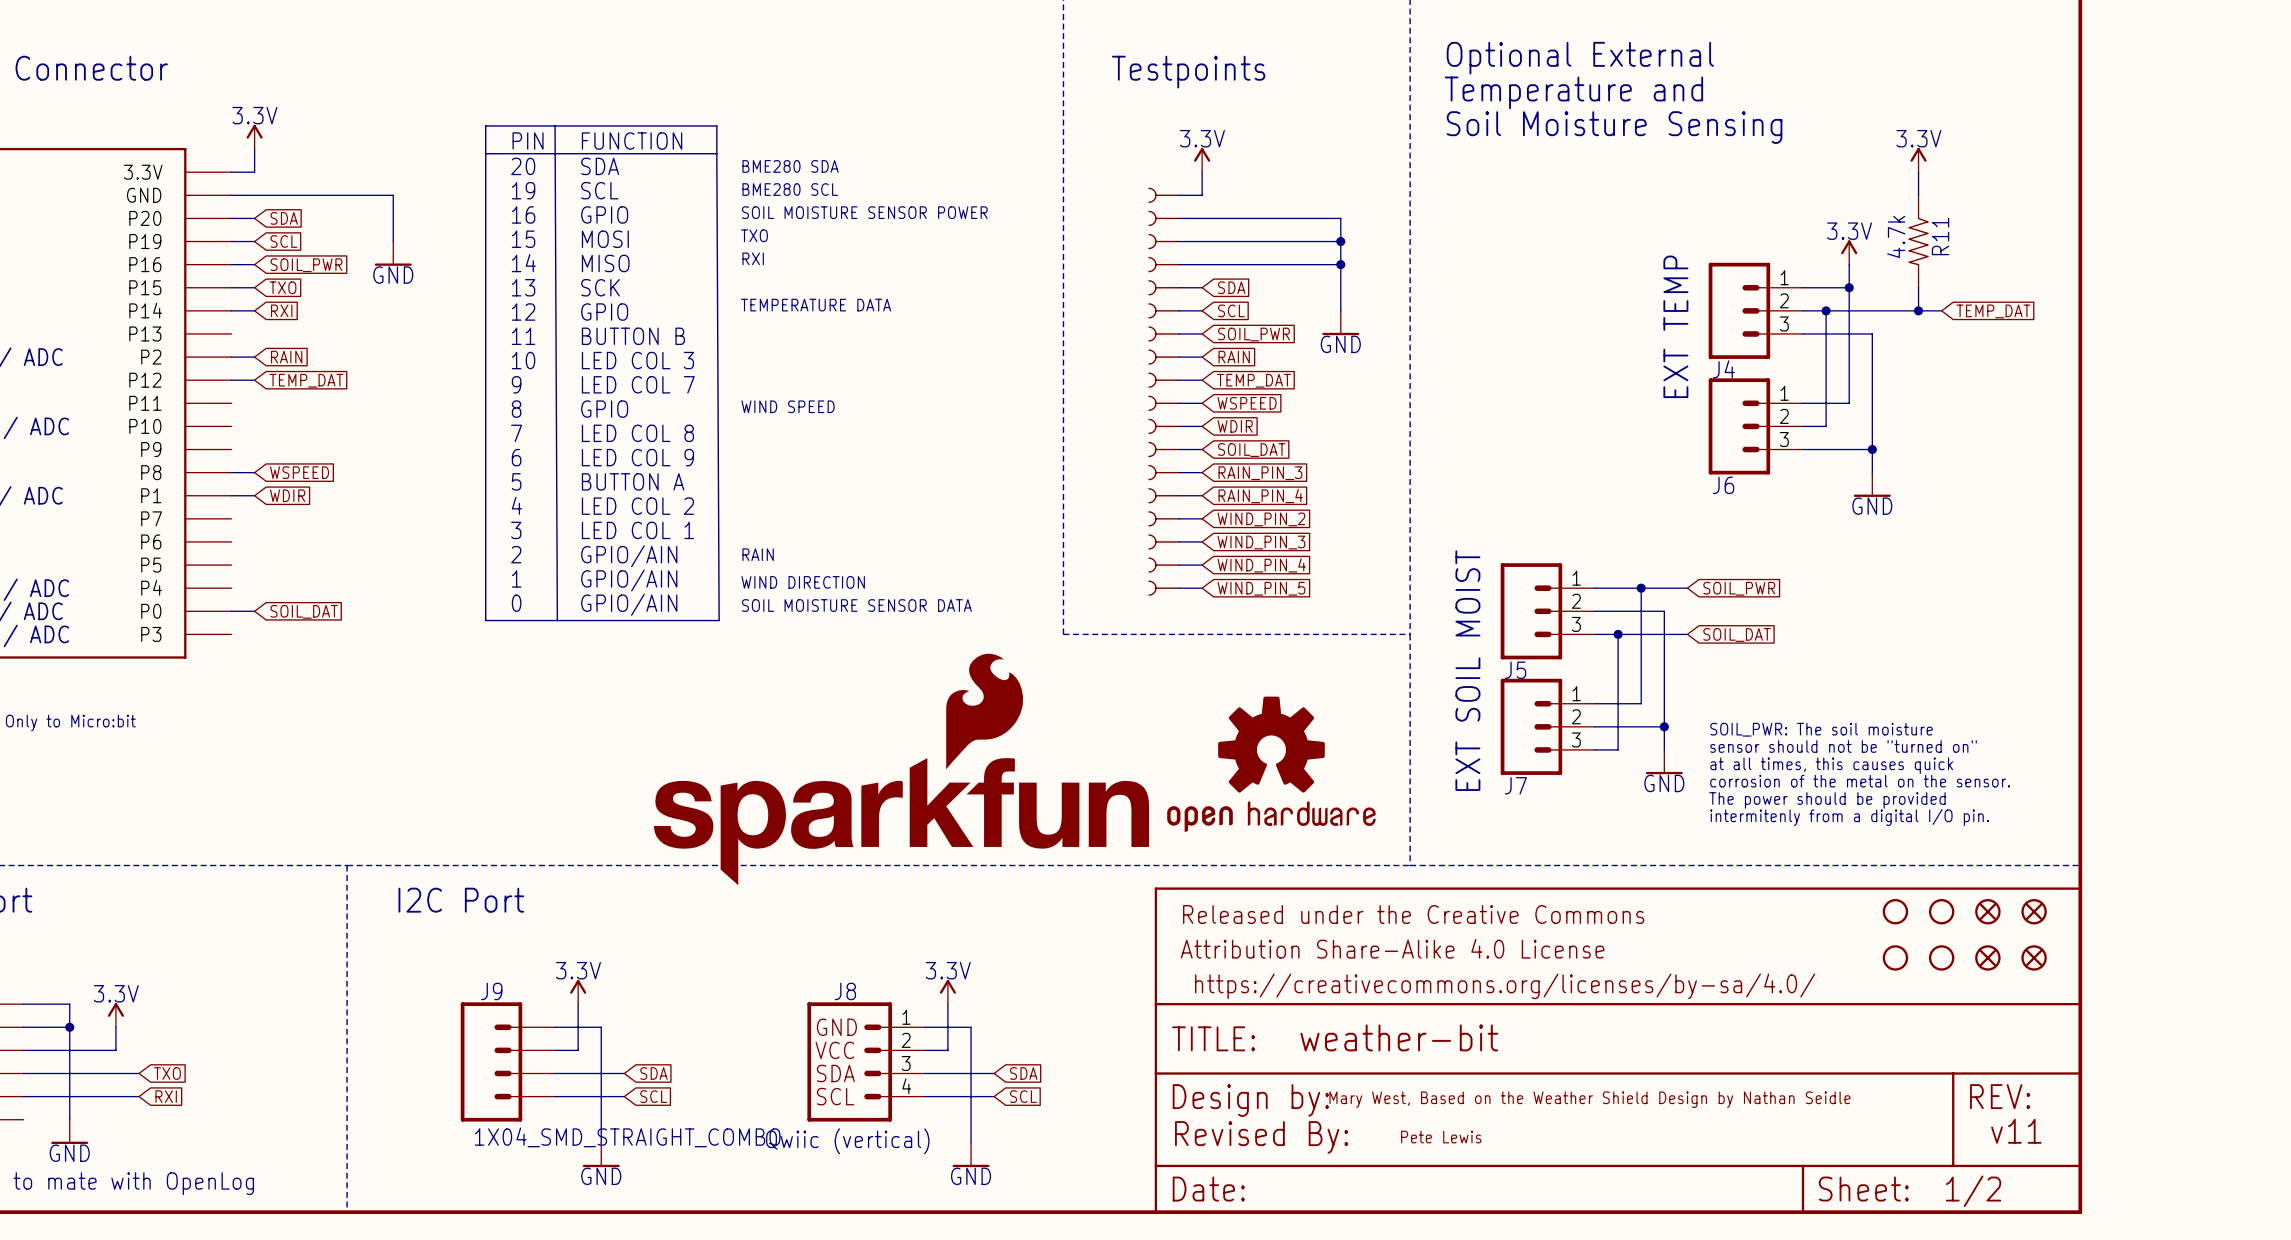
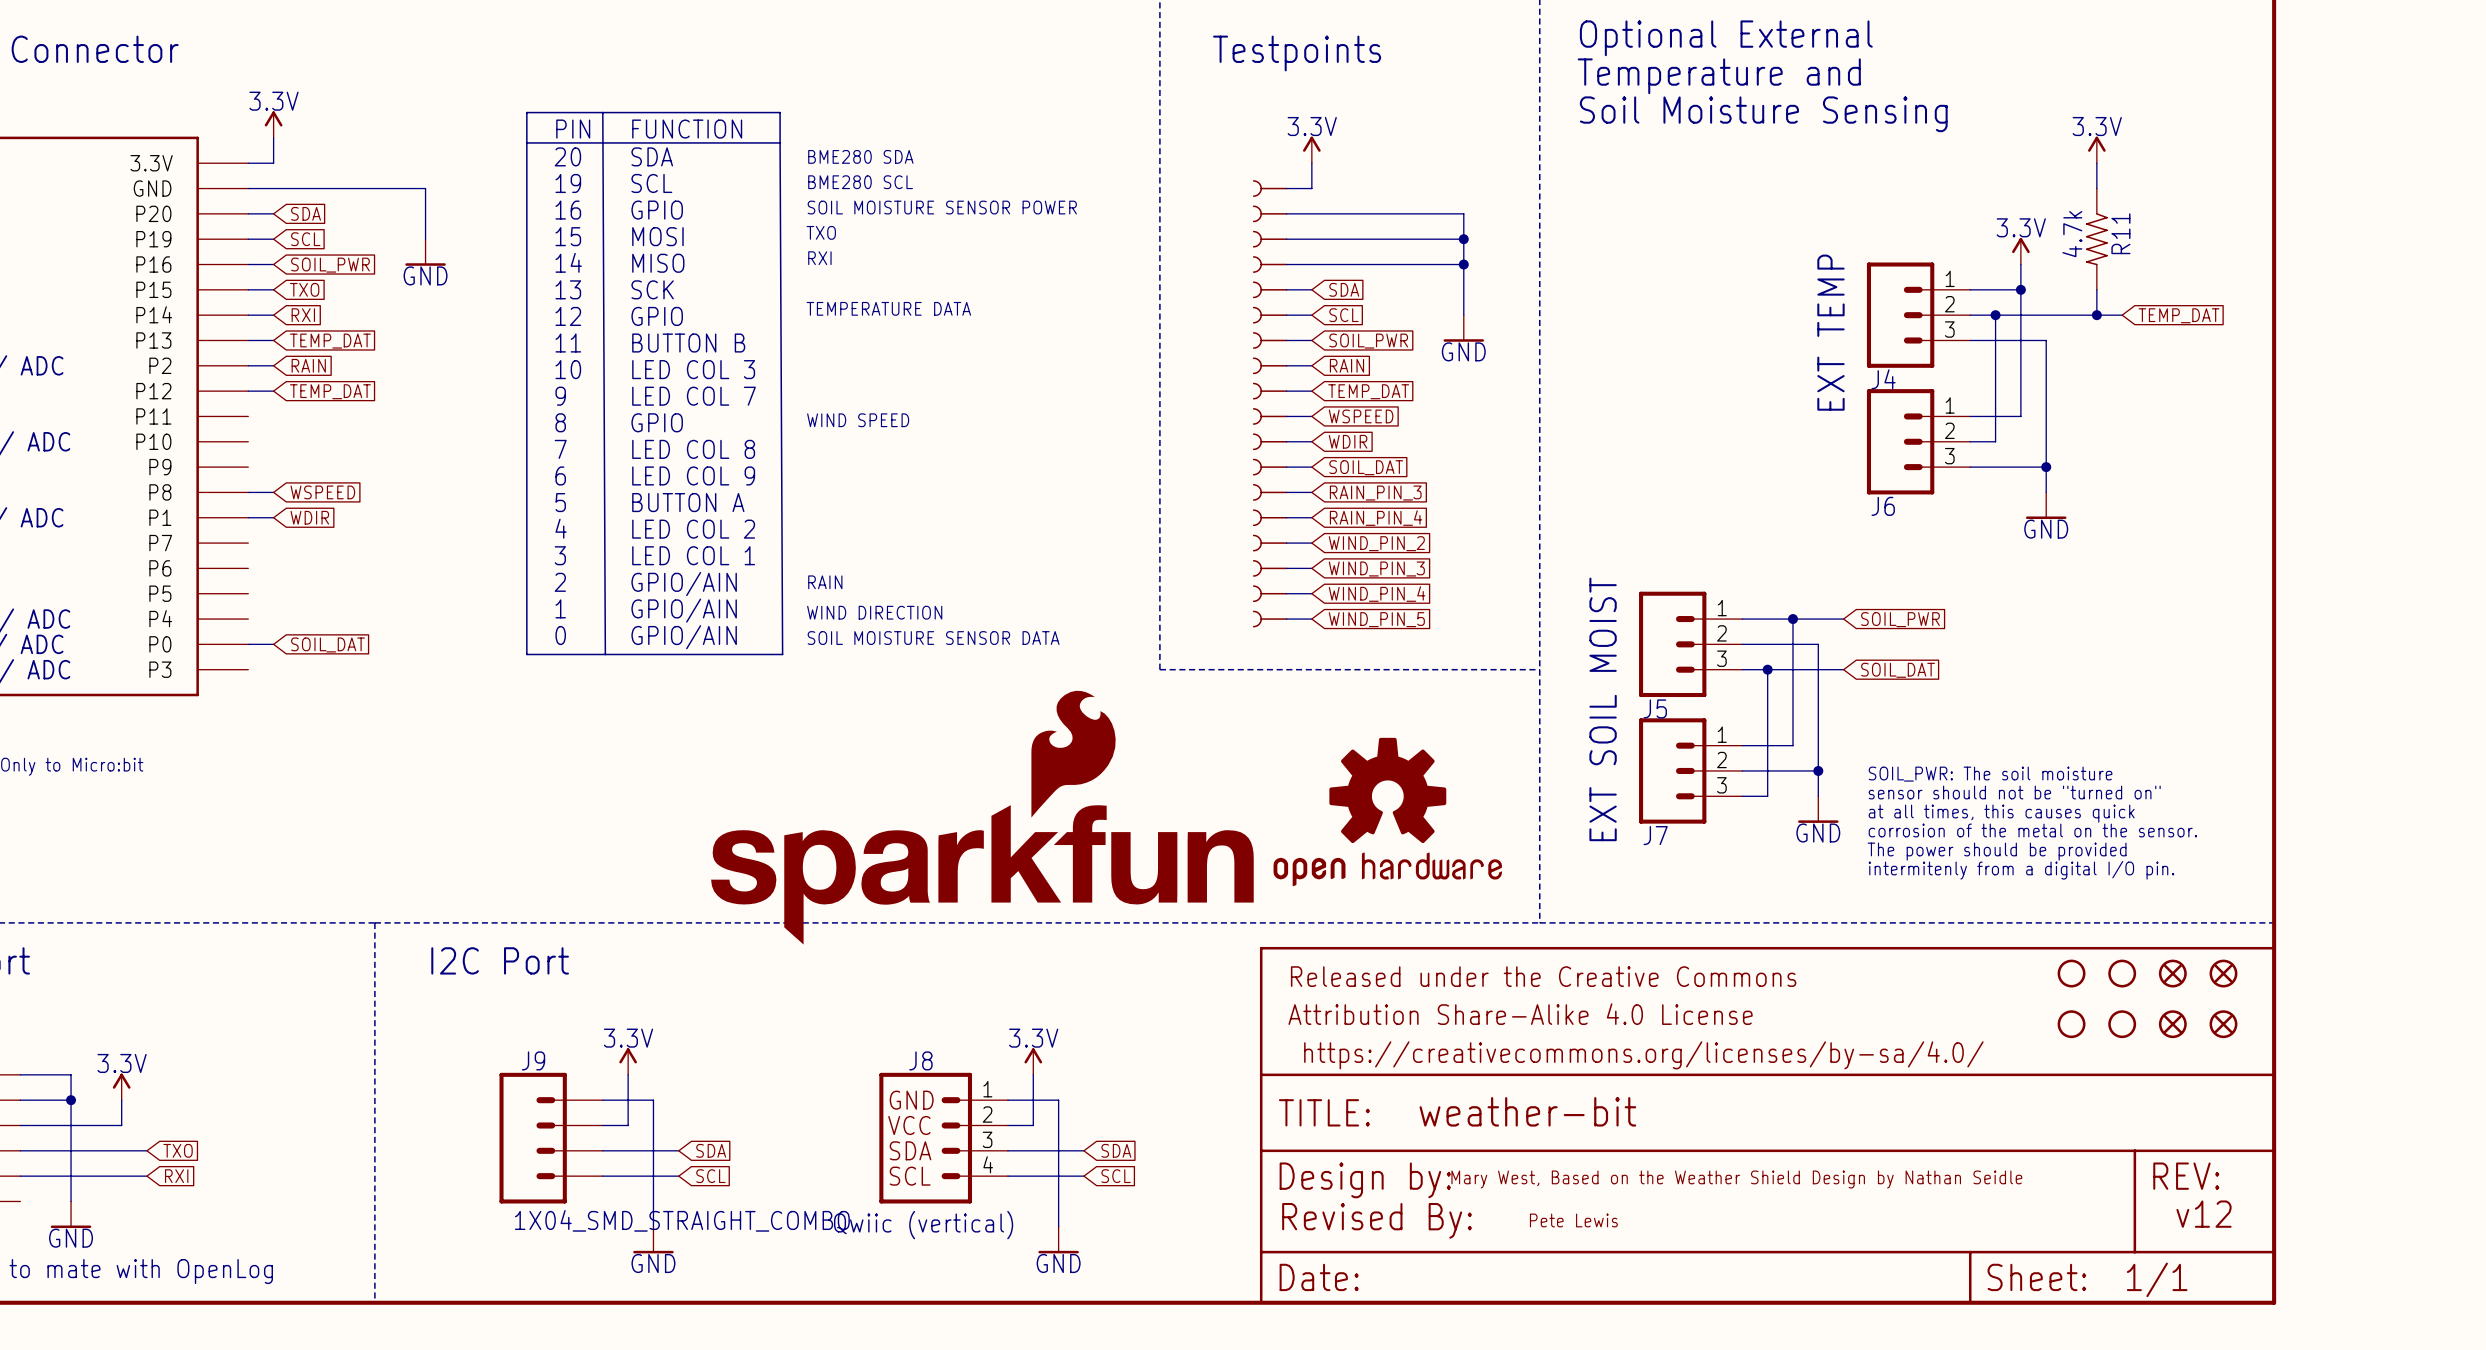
wire: none -> (248, 340) (273, 340)
global label: none -> TEMP_DAT (330, 341)
text: v11 (2016, 1131) -> v12 (2204, 1214)
part text: 1/2 (1973, 1191) -> 1/1 (2157, 1279)

